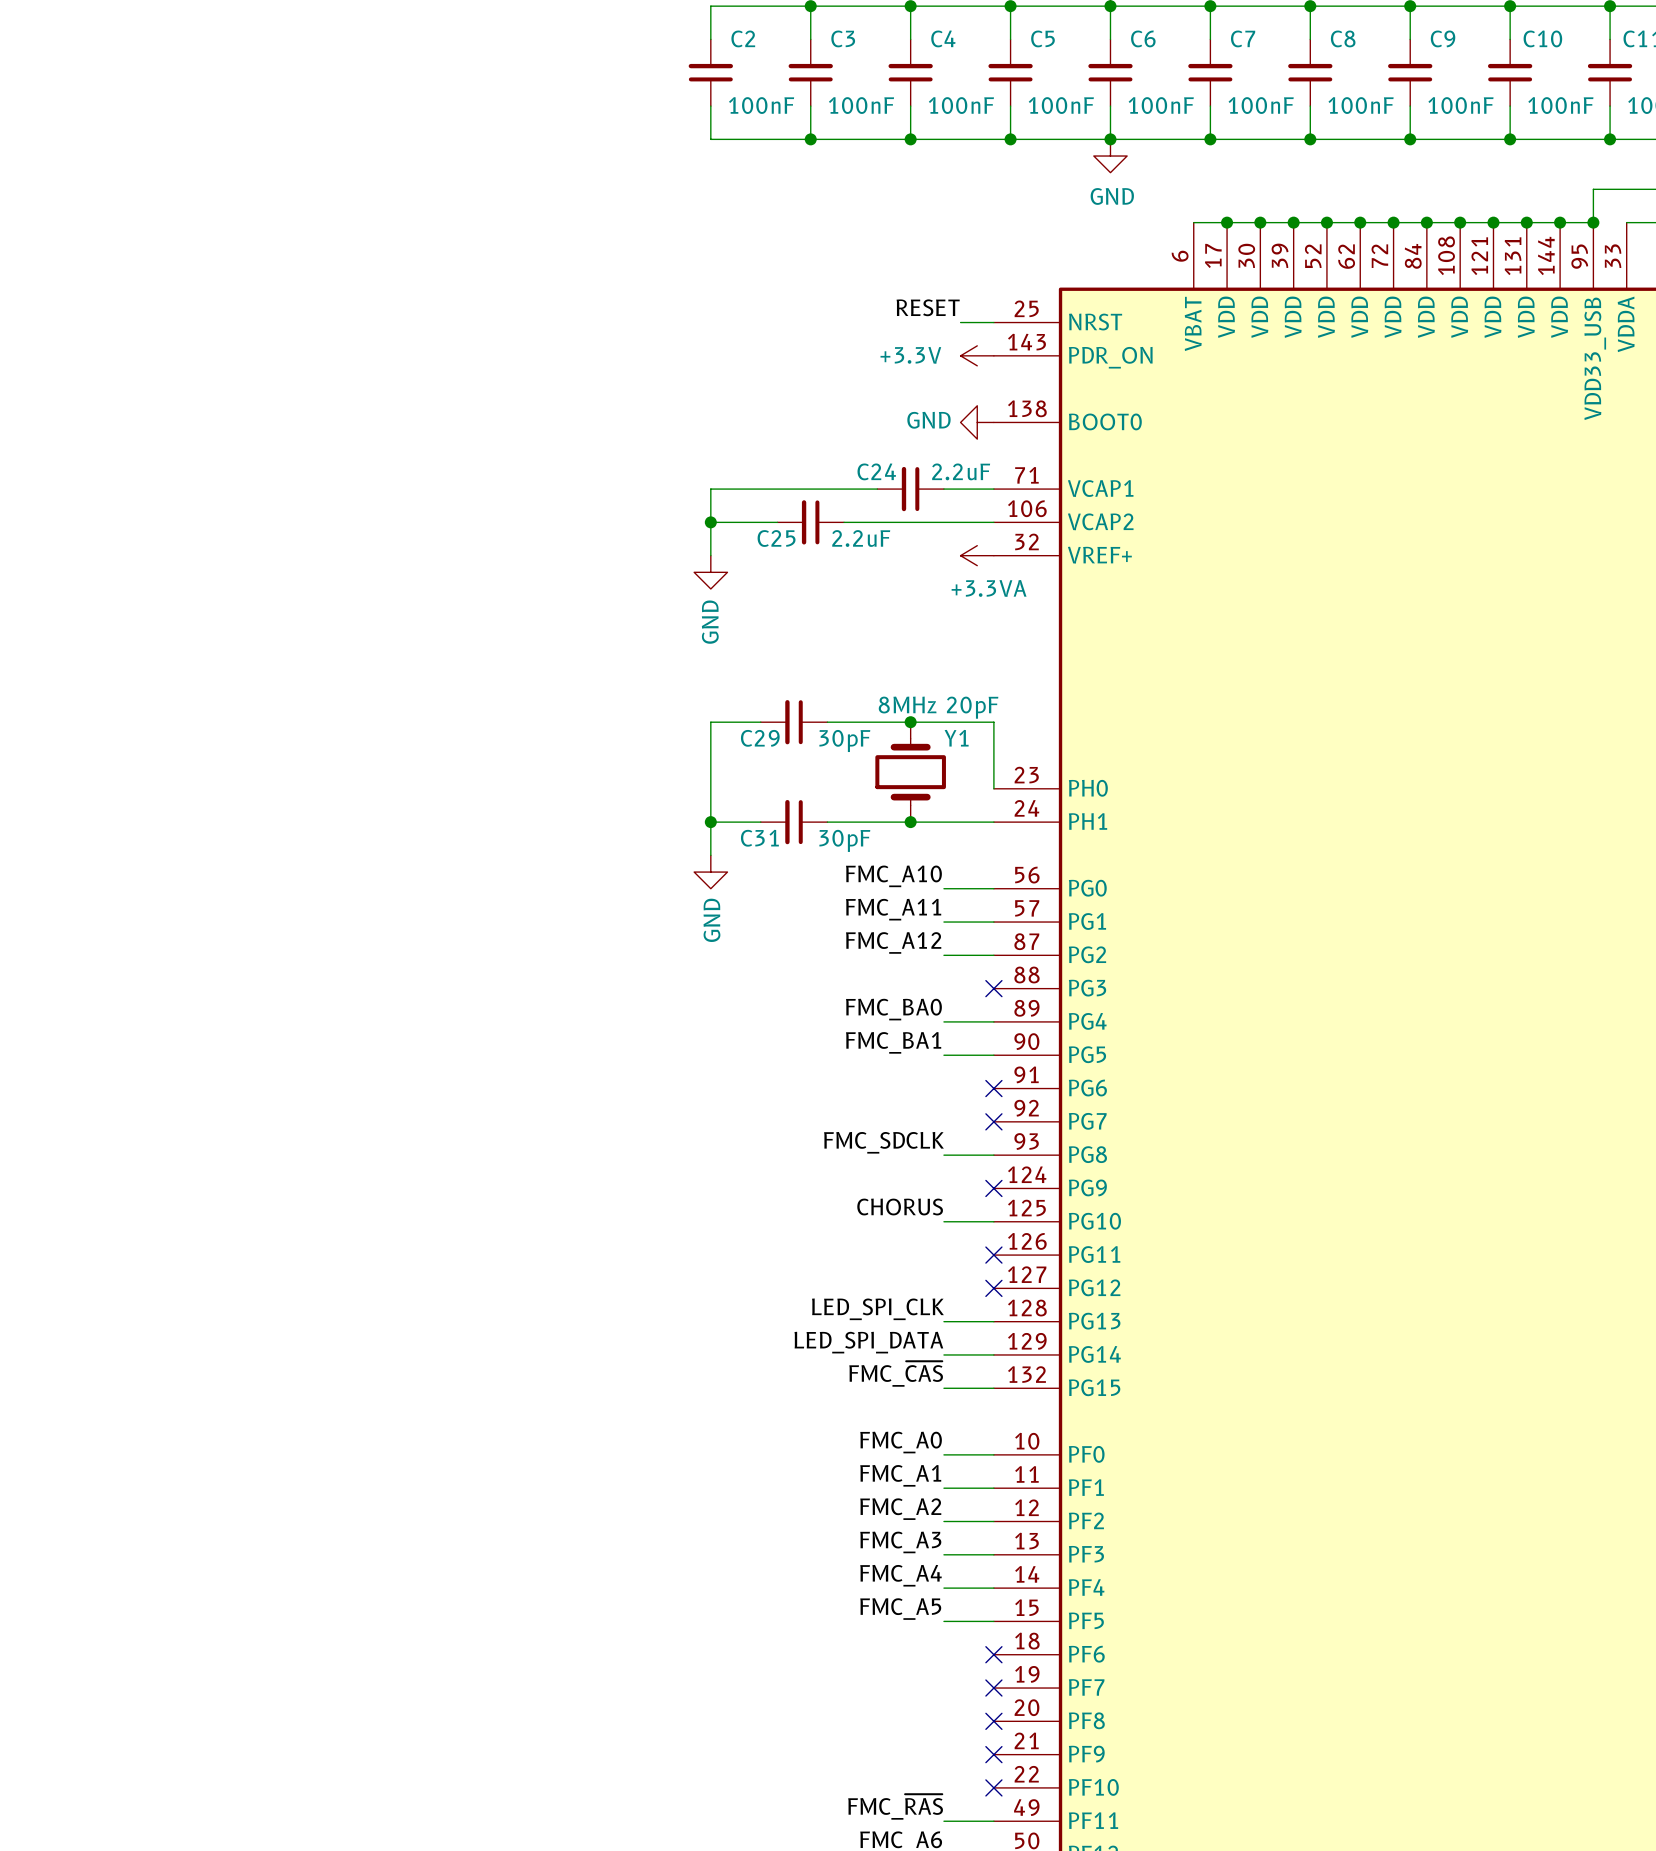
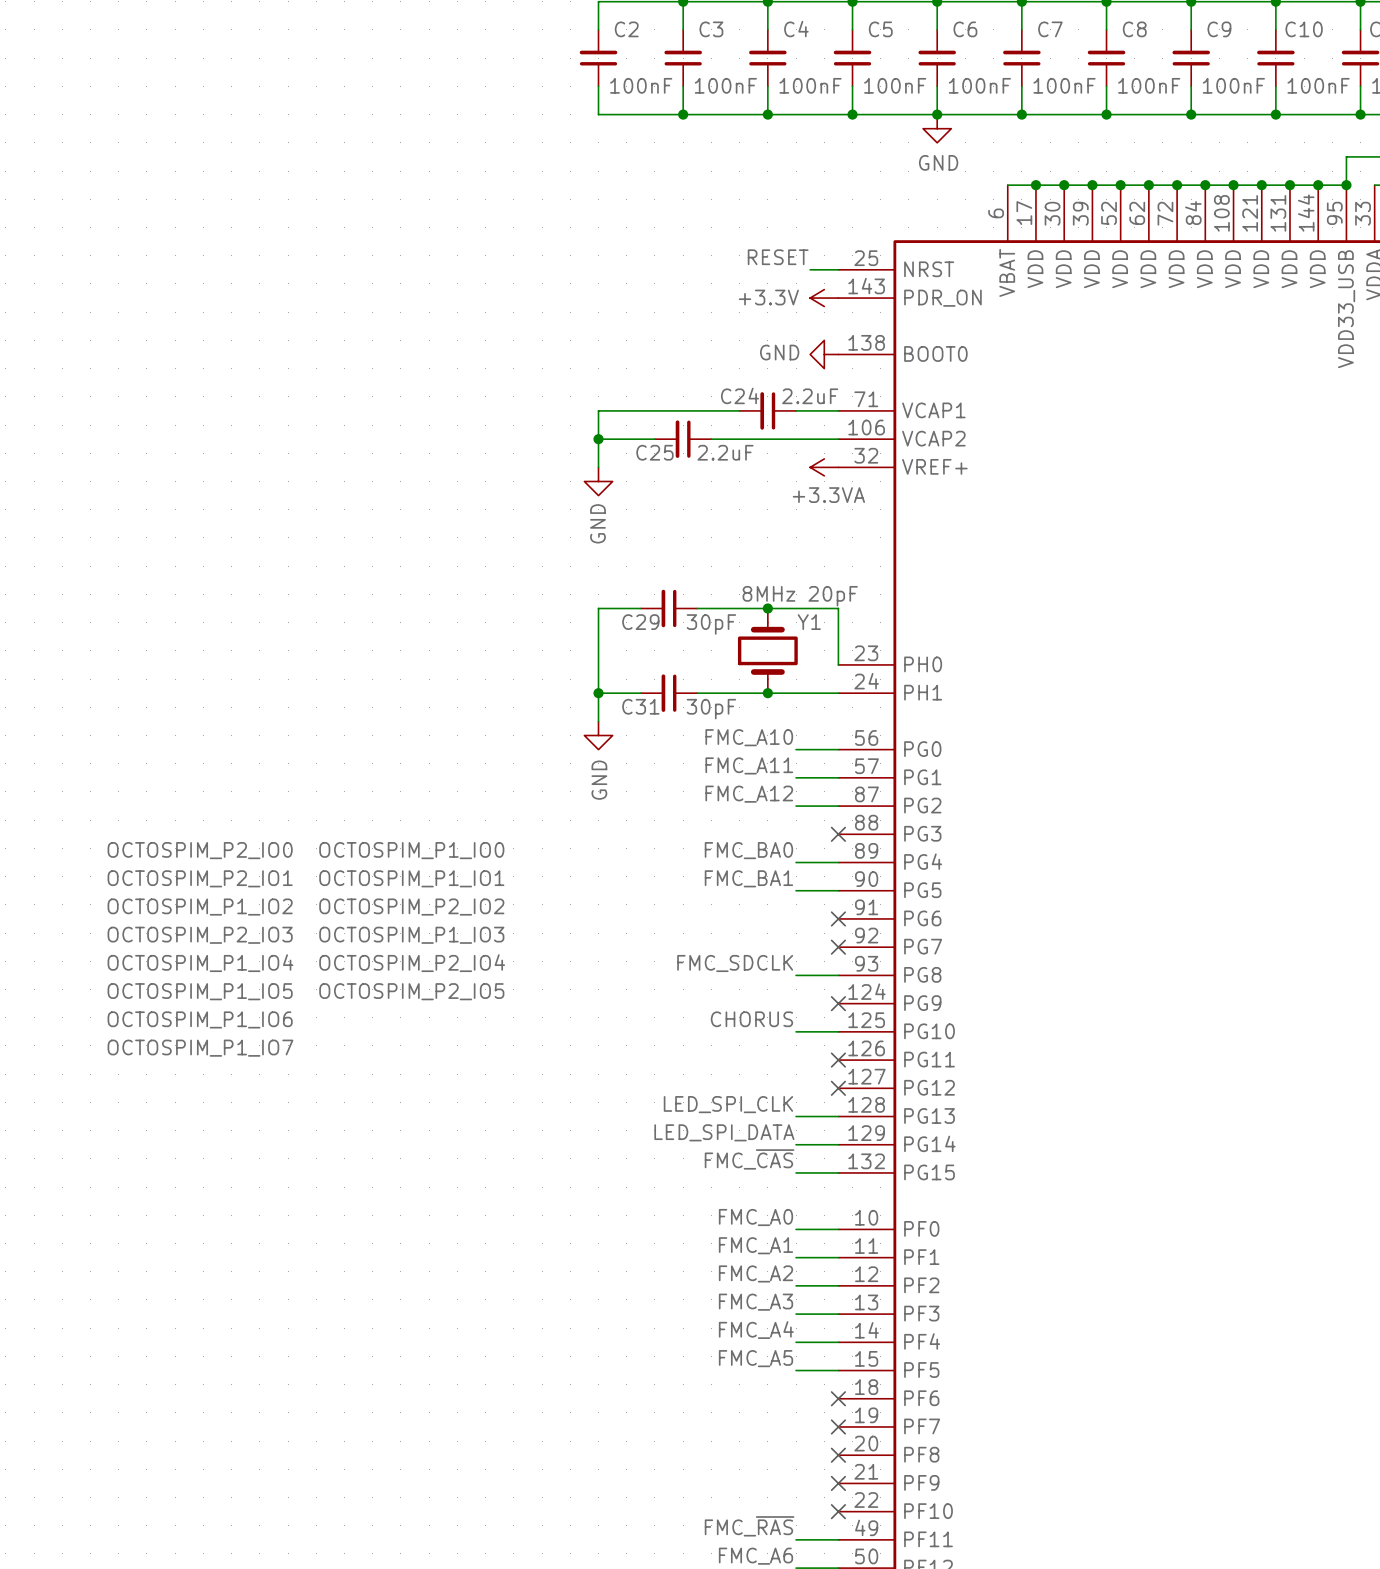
label: none -> OCTOSPIM_P2_IO0 (200, 850)
label: none -> OCTOSPIM_P1_IO0 (411, 850)
label: none -> OCTOSPIM_P2_IO1 (200, 878)
label: none -> OCTOSPIM_P1_IO1 (411, 878)
label: none -> OCTOSPIM_P1_IO2 (200, 907)
label: none -> OCTOSPIM_P2_IO2 (411, 907)
label: none -> OCTOSPIM_P2_IO3 (200, 935)
label: none -> OCTOSPIM_P1_IO3 (411, 935)
label: none -> OCTOSPIM_P1_IO4 (200, 963)
label: none -> OCTOSPIM_P2_IO4 (412, 963)
label: none -> OCTOSPIM_P1_IO5 (200, 991)
label: none -> OCTOSPIM_P2_IO5 (411, 991)
label: none -> OCTOSPIM_P1_IO6 (200, 1019)
label: none -> OCTOSPIM_P1_IO7 (200, 1048)

